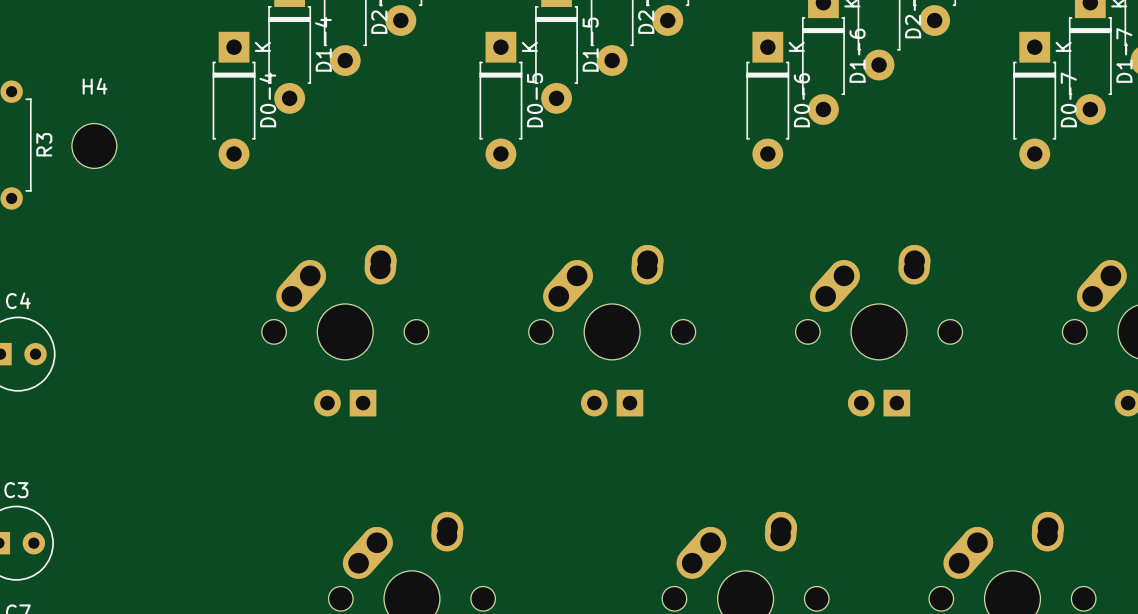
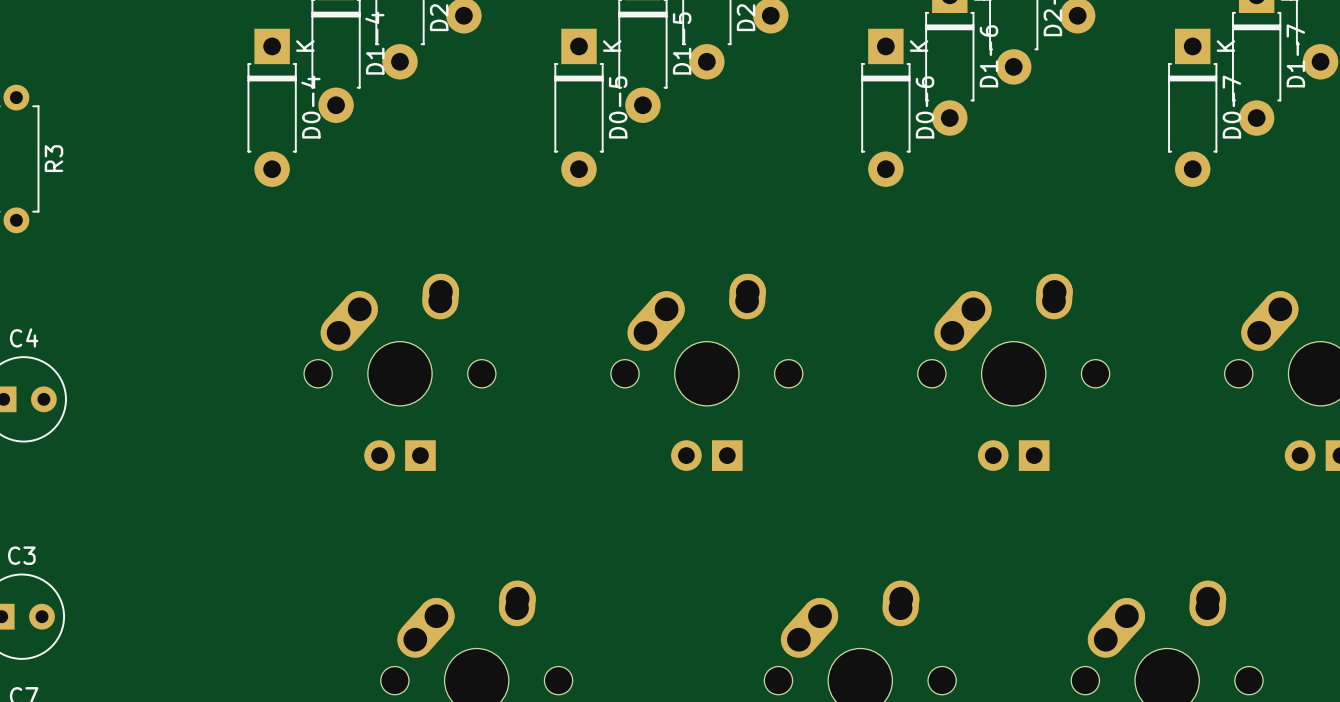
H4: (94, 145) -> none

